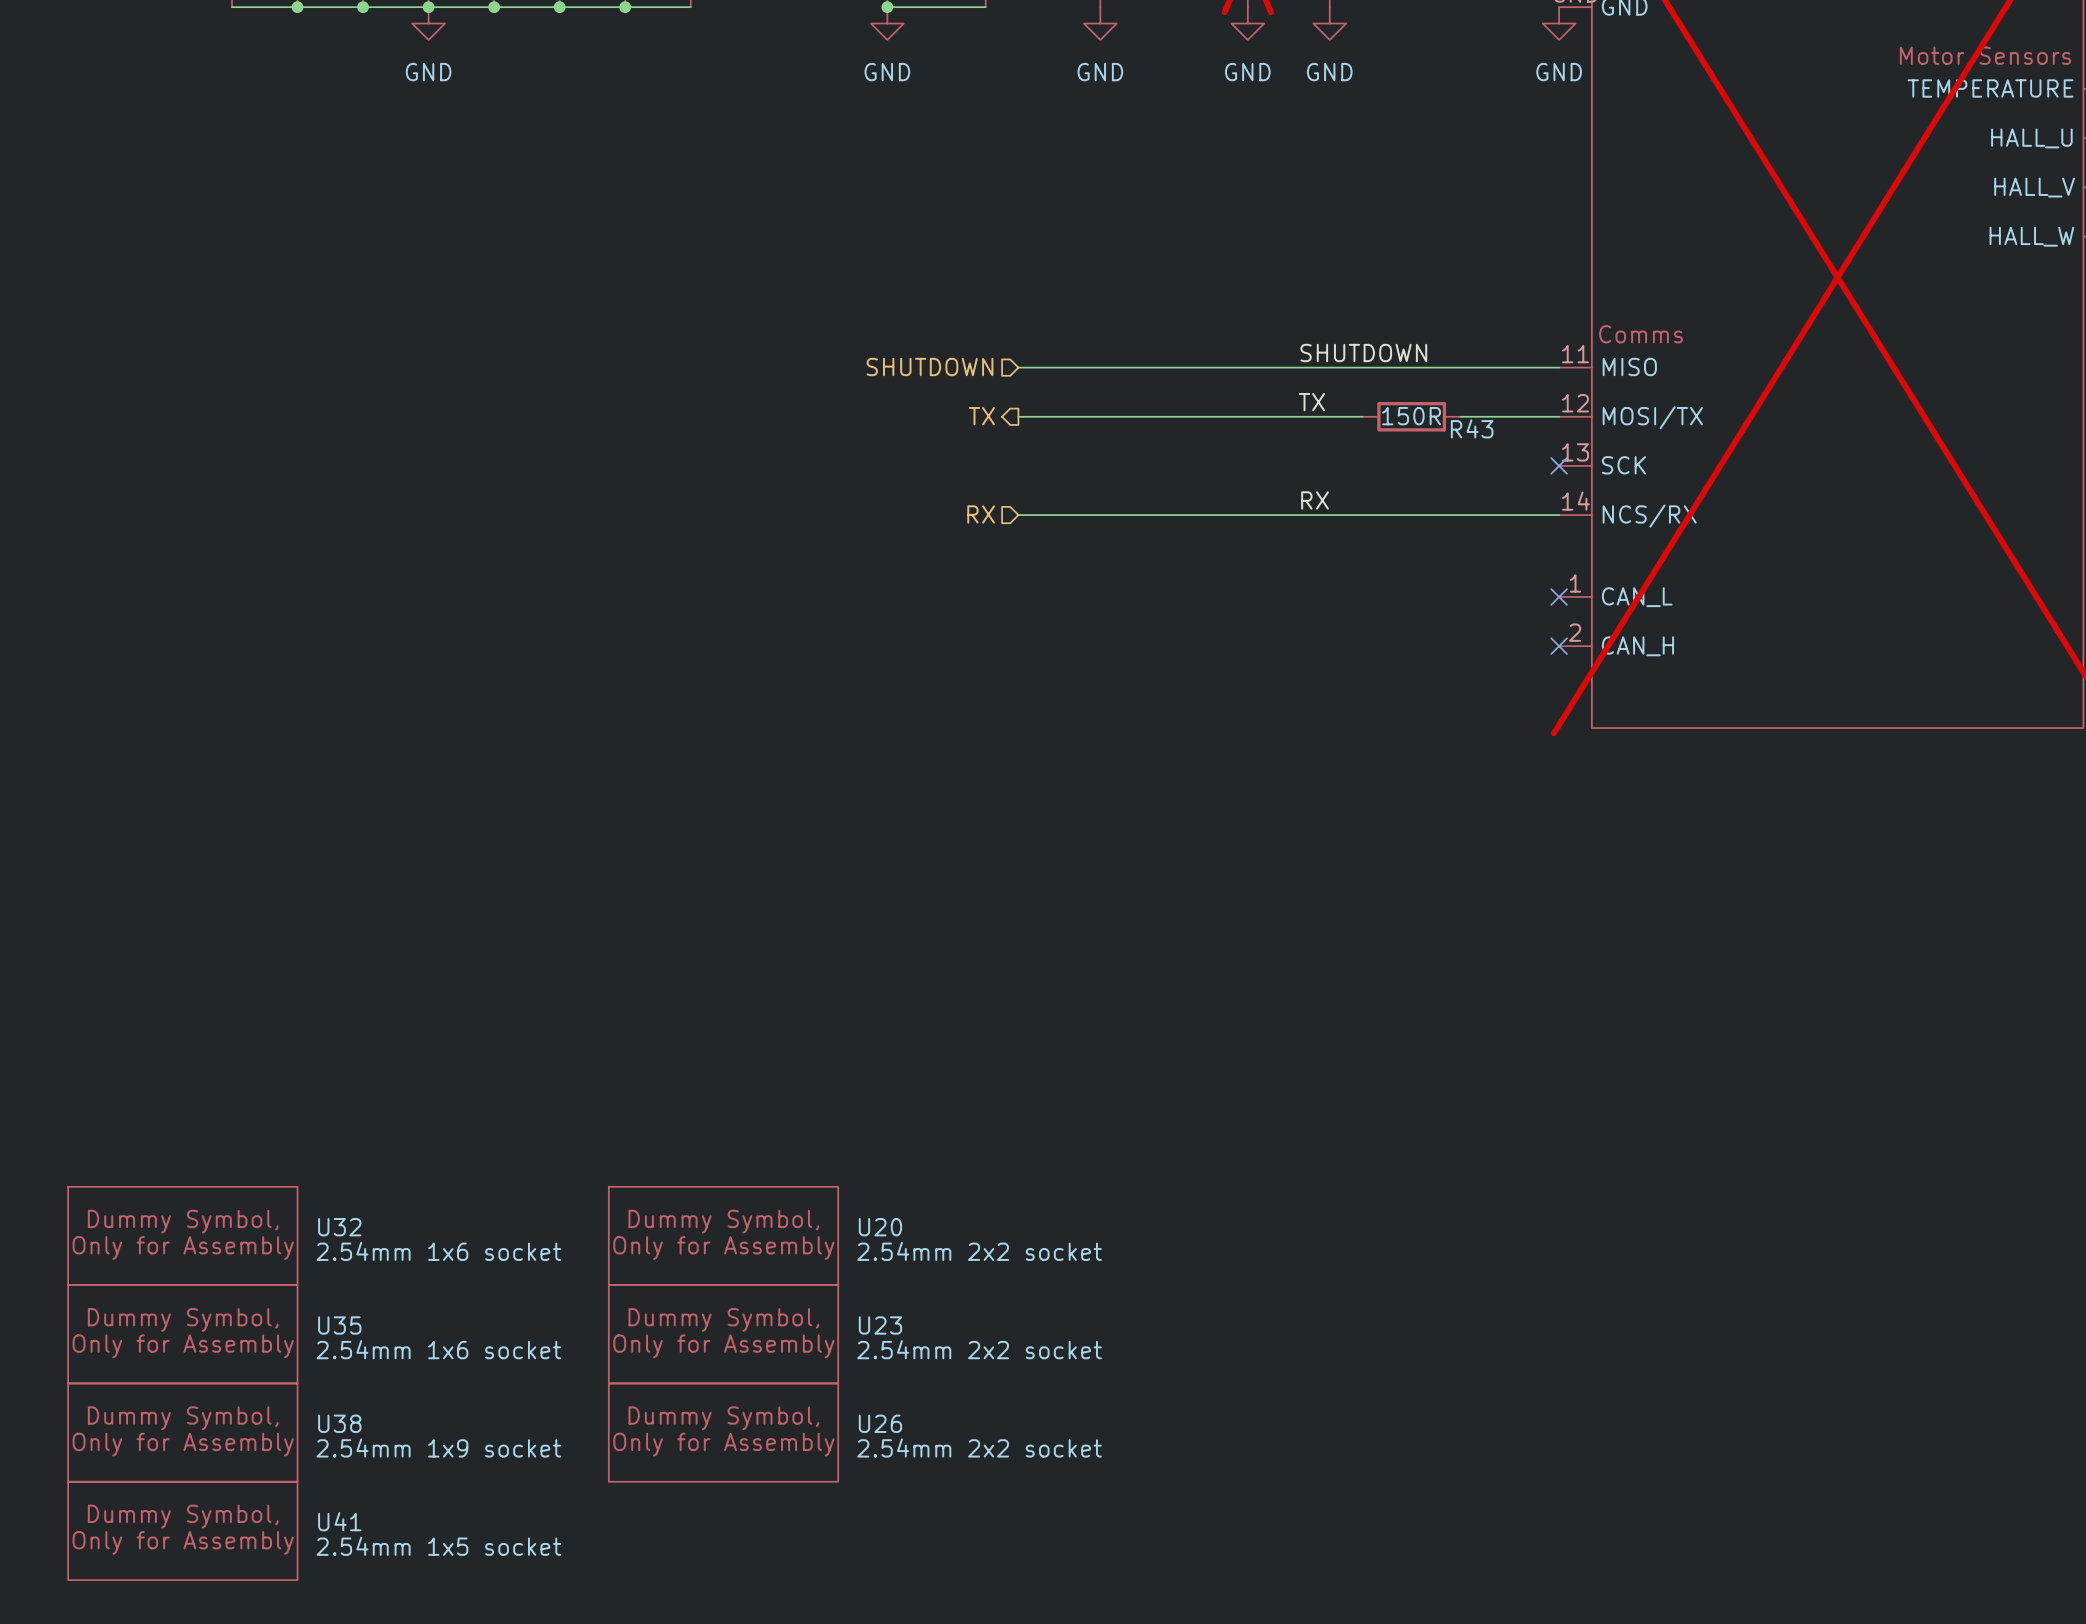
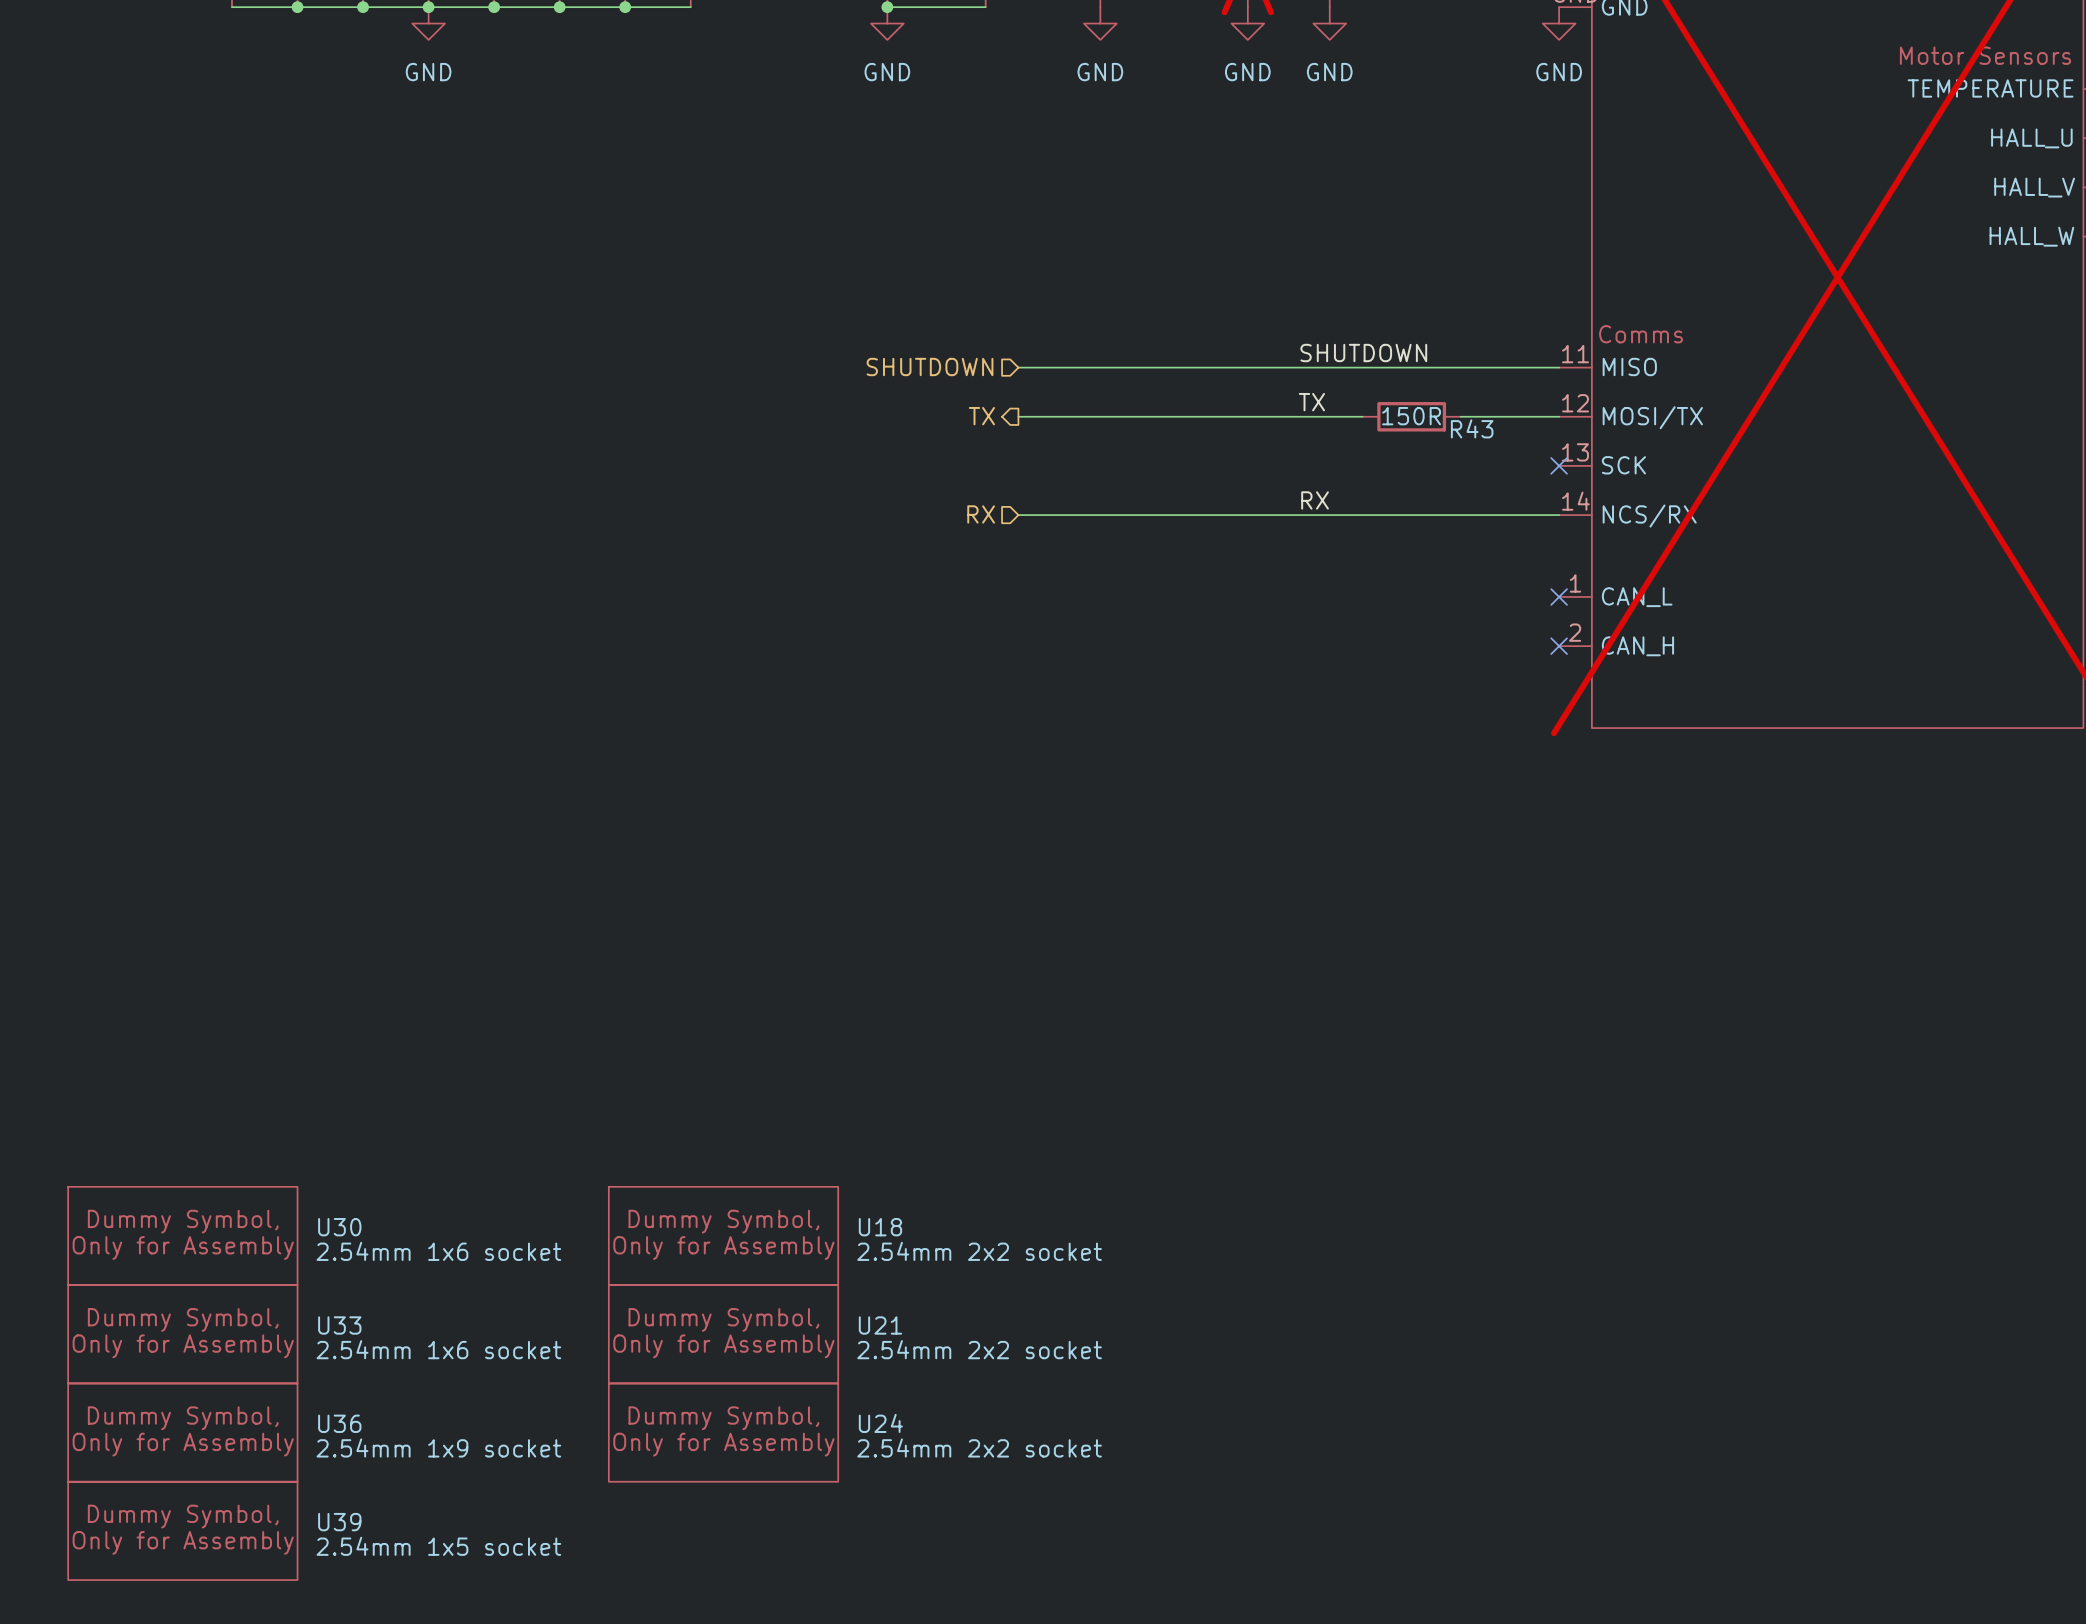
U32 name: U32 (339, 1227) -> U30 (339, 1227)
U20 name: U20 (880, 1227) -> U18 (880, 1227)
U35 name: U35 (339, 1325) -> U33 (339, 1325)
U23 name: U23 (880, 1325) -> U21 (880, 1325)
U38 name: U38 (339, 1423) -> U36 (339, 1423)
U26 name: U26 (880, 1423) -> U24 (880, 1423)
U41 name: U41 (339, 1521) -> U39 (339, 1522)

